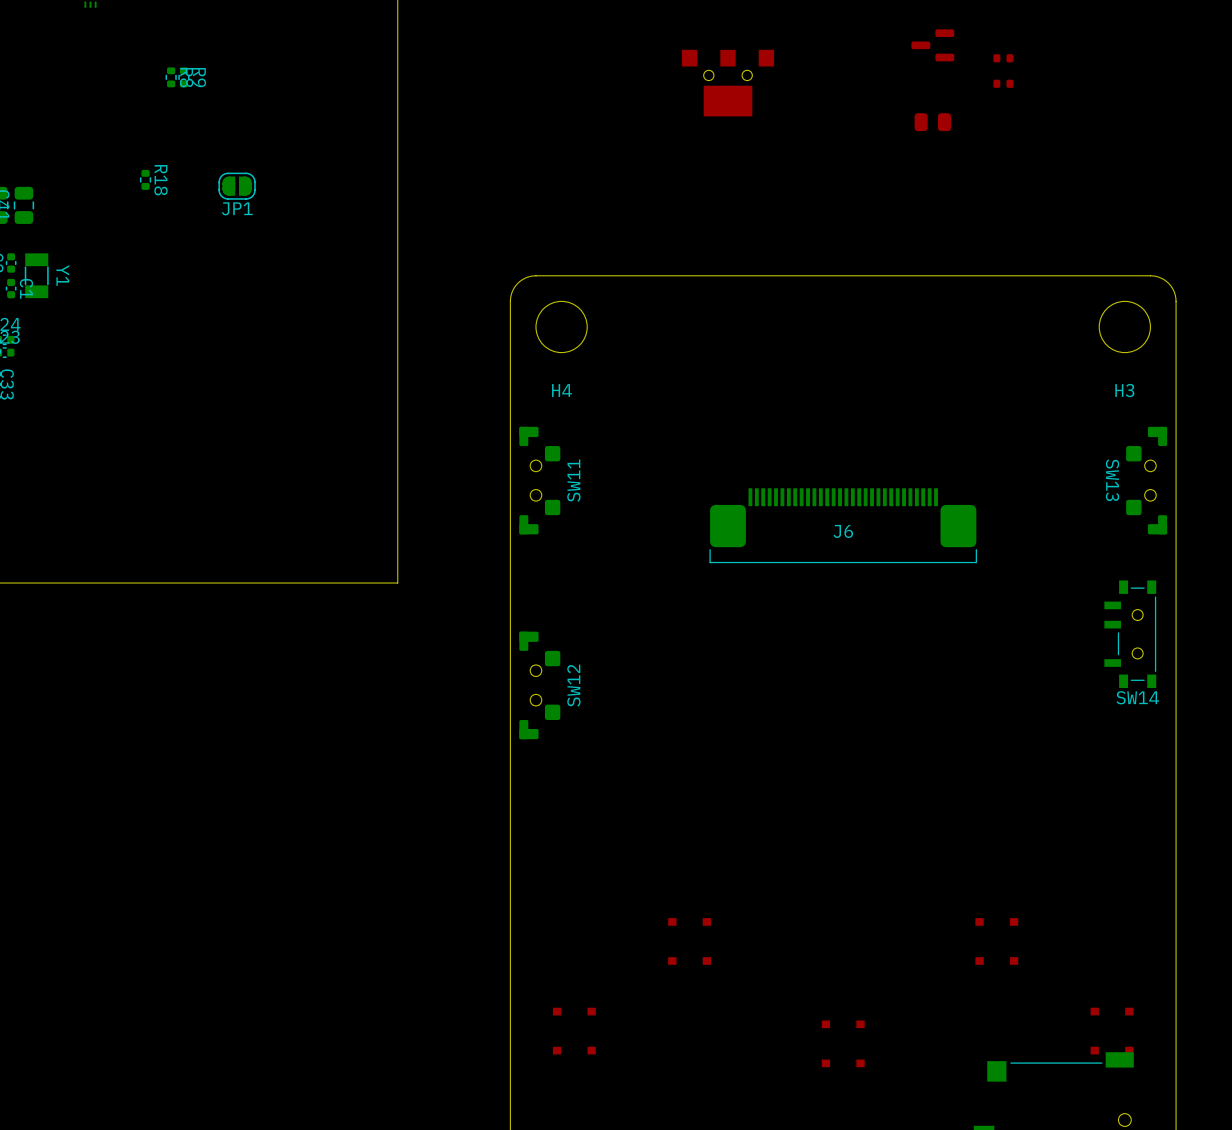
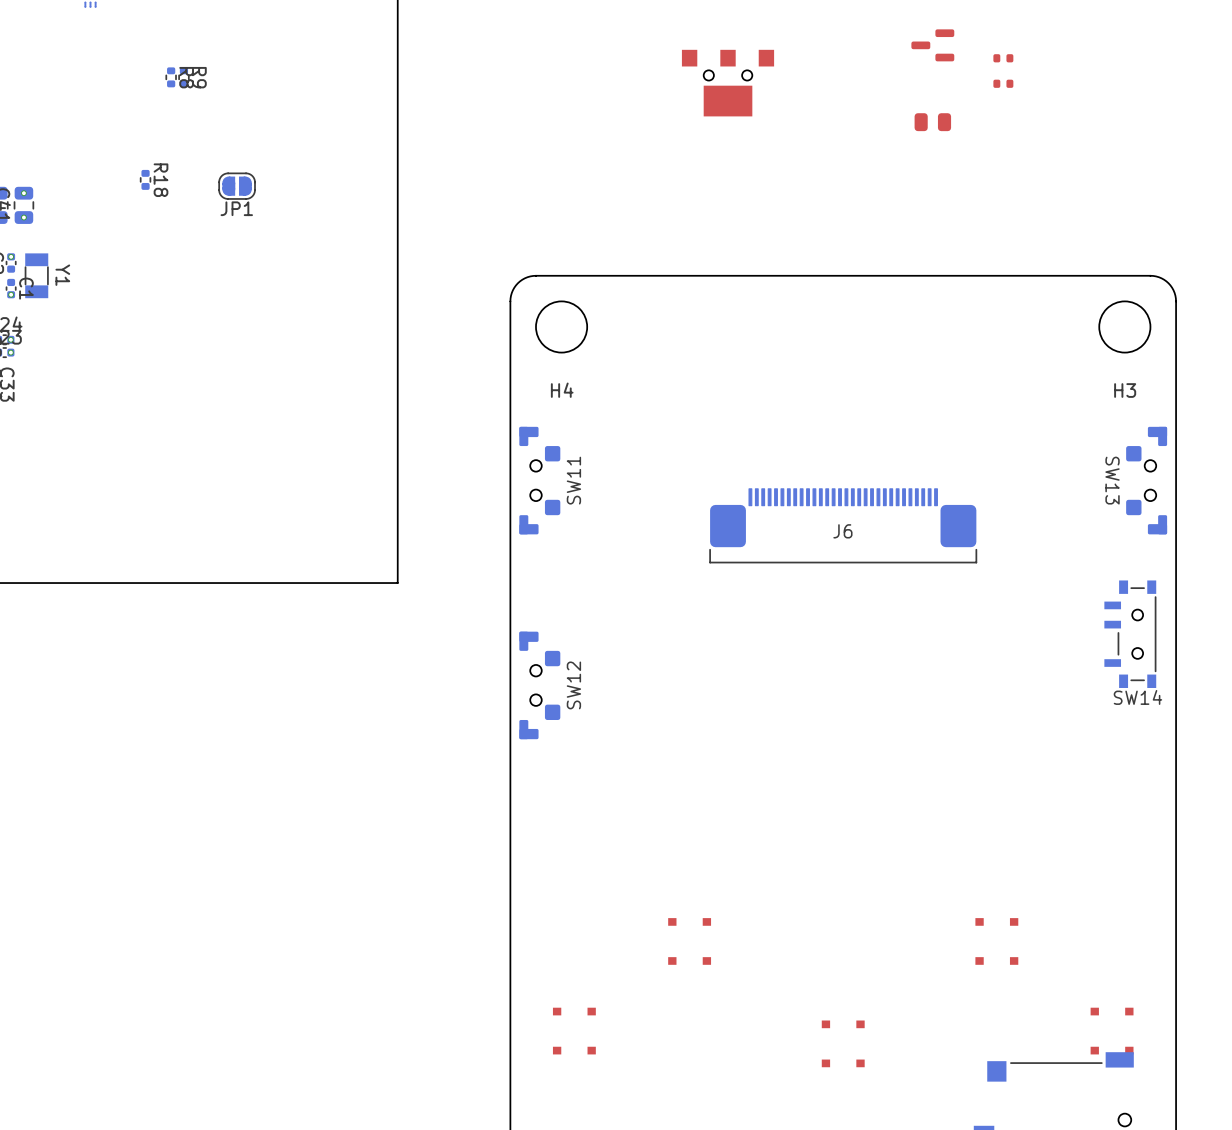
via: none -> (23, 193)
via: none -> (23, 217)
via: none -> (11, 256)
via: none -> (11, 294)
via: none -> (10, 339)
via: none -> (10, 352)

